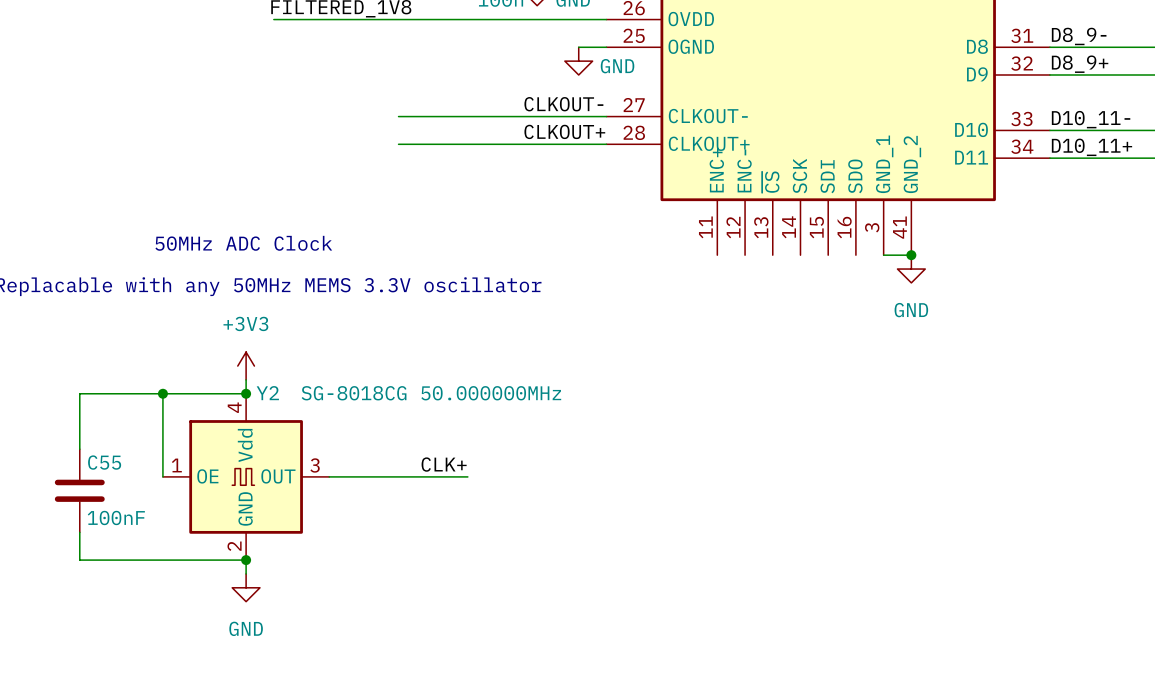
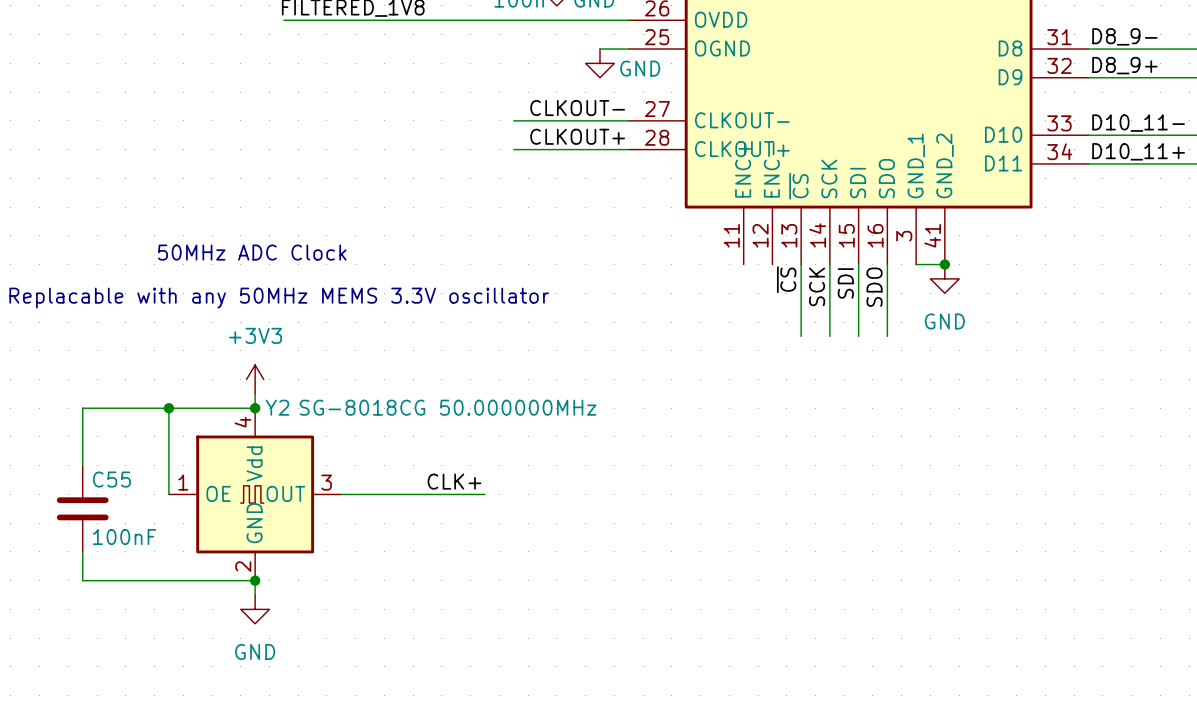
wire: (398, 116) (495, 116) -> none
wire: (398, 144) (495, 144) -> none
wire: none -> (801, 264) (801, 336)
wire: none -> (829, 264) (829, 336)
wire: none -> (858, 264) (858, 336)
wire: none -> (887, 264) (887, 336)
label: none -> ~{CS} (786, 279)
label: none -> SCK (817, 286)
label: none -> SDI (845, 283)
label: none -> SDO (874, 287)

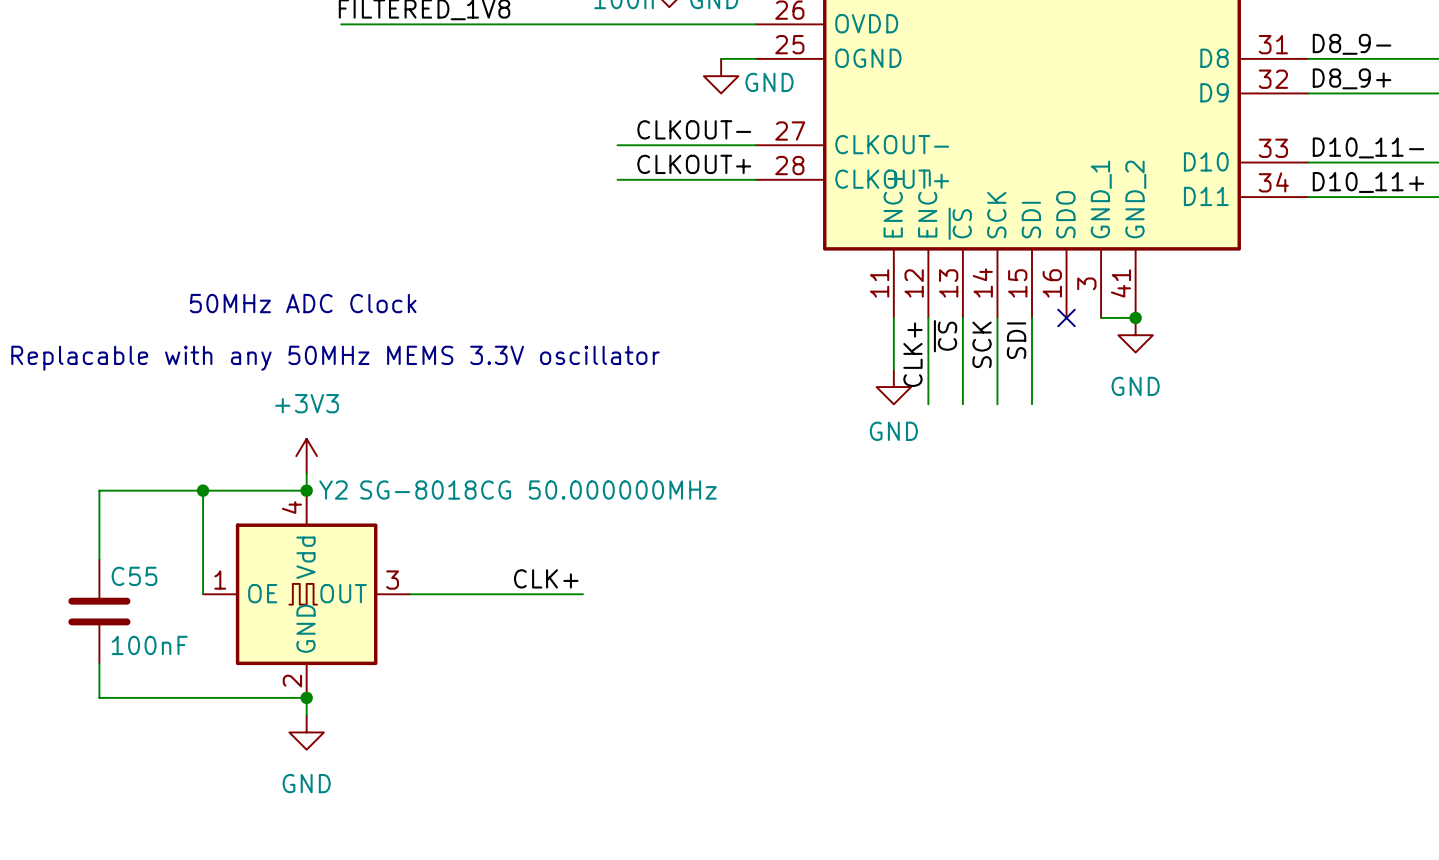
wire: none -> (893, 317) (893, 369)
wire: (887, 264) (887, 336) -> (928, 317) (928, 404)
no-connect mark: none -> (1066, 317)
label: SDO (874, 287) -> none
label: none -> CLK+ (912, 354)
power symbol: none -> GND (893, 387)

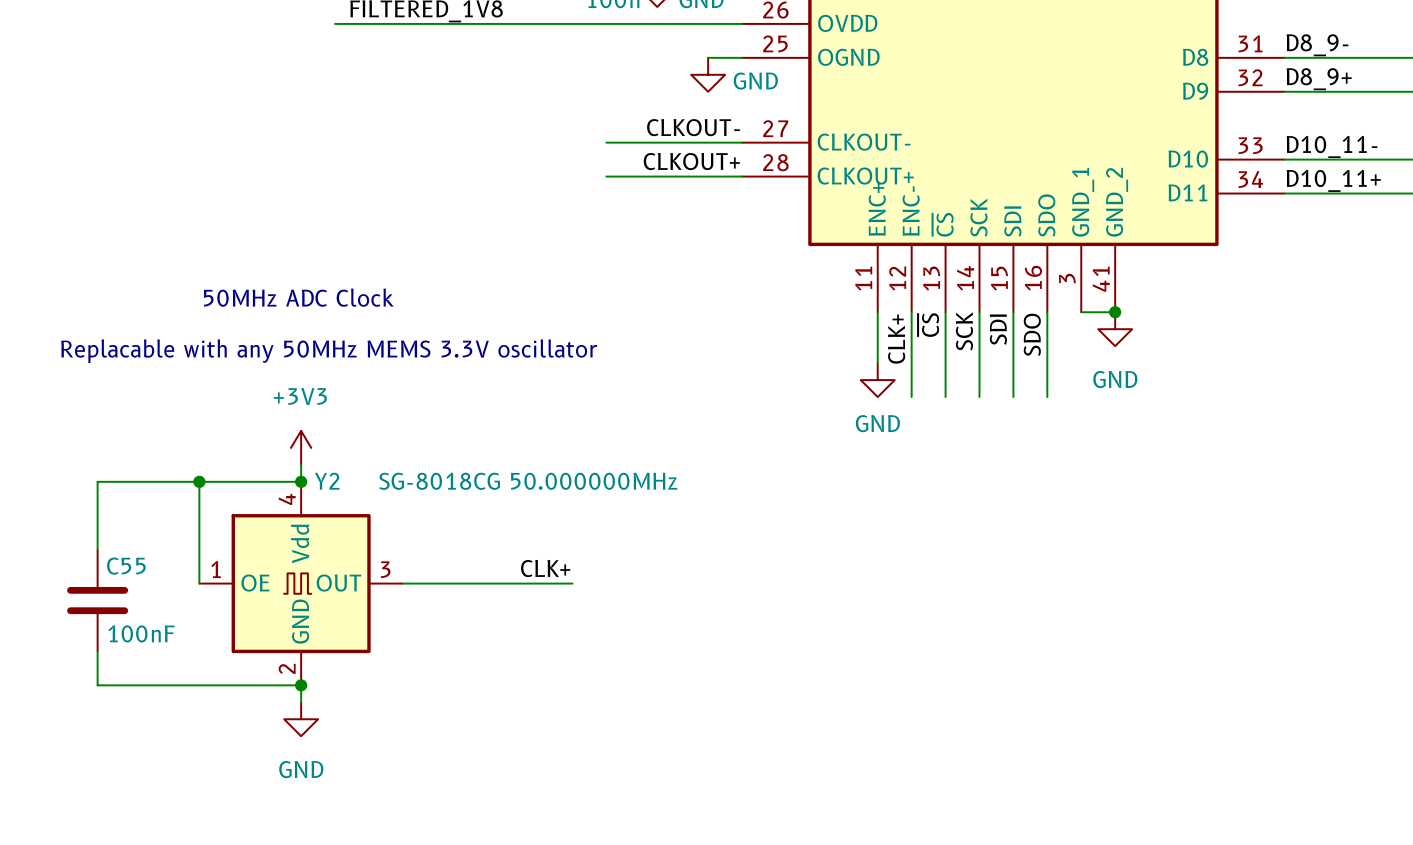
wire: none -> (1047, 312) (1047, 397)
no-connect mark: (1066, 317) -> none
label: none -> SDO (1032, 334)

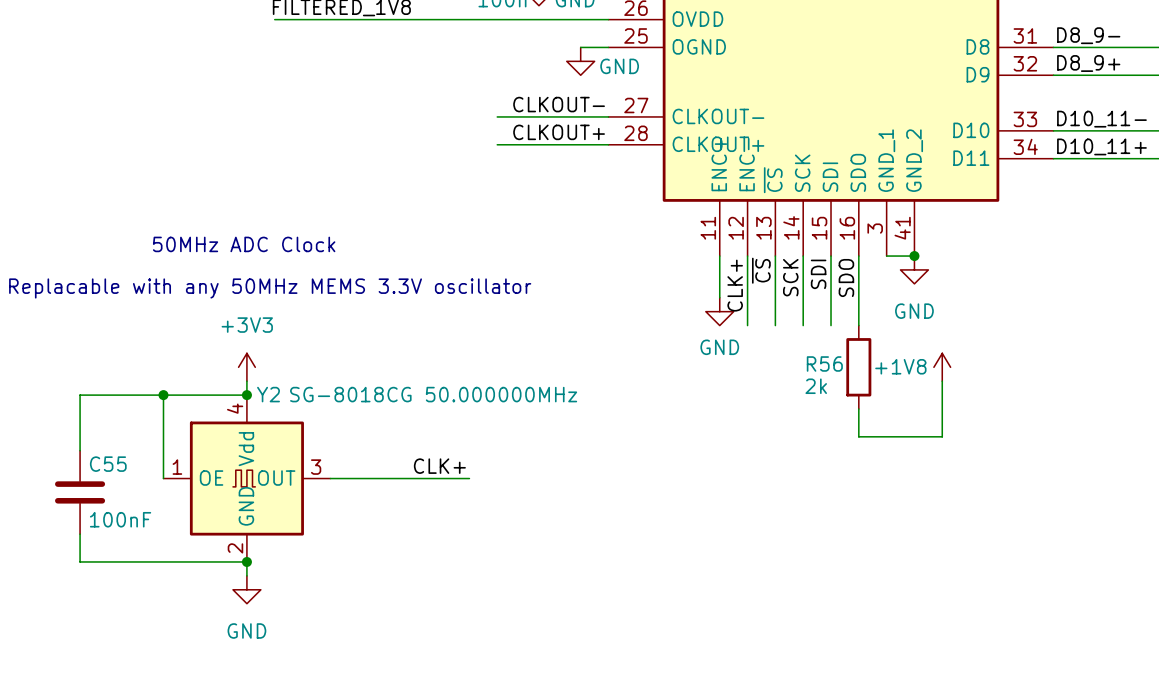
R56: none -> 2k (858, 367)
power symbol: none -> +1V8 (942, 367)
wire: none -> (942, 381) (942, 436) (858, 436) (858, 409)

